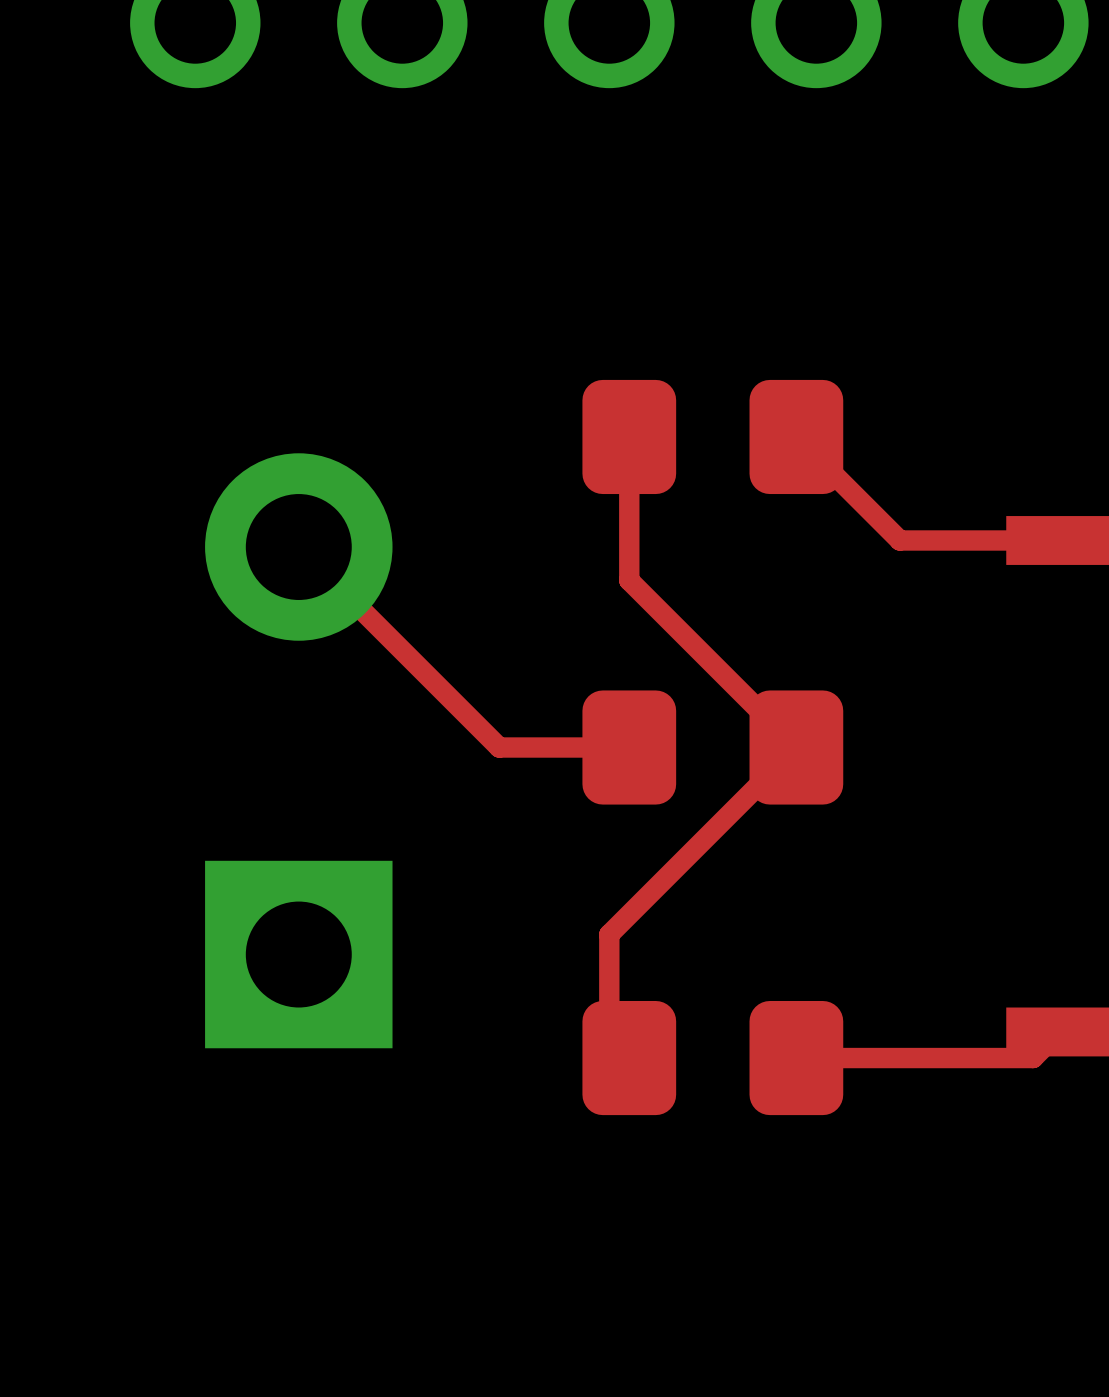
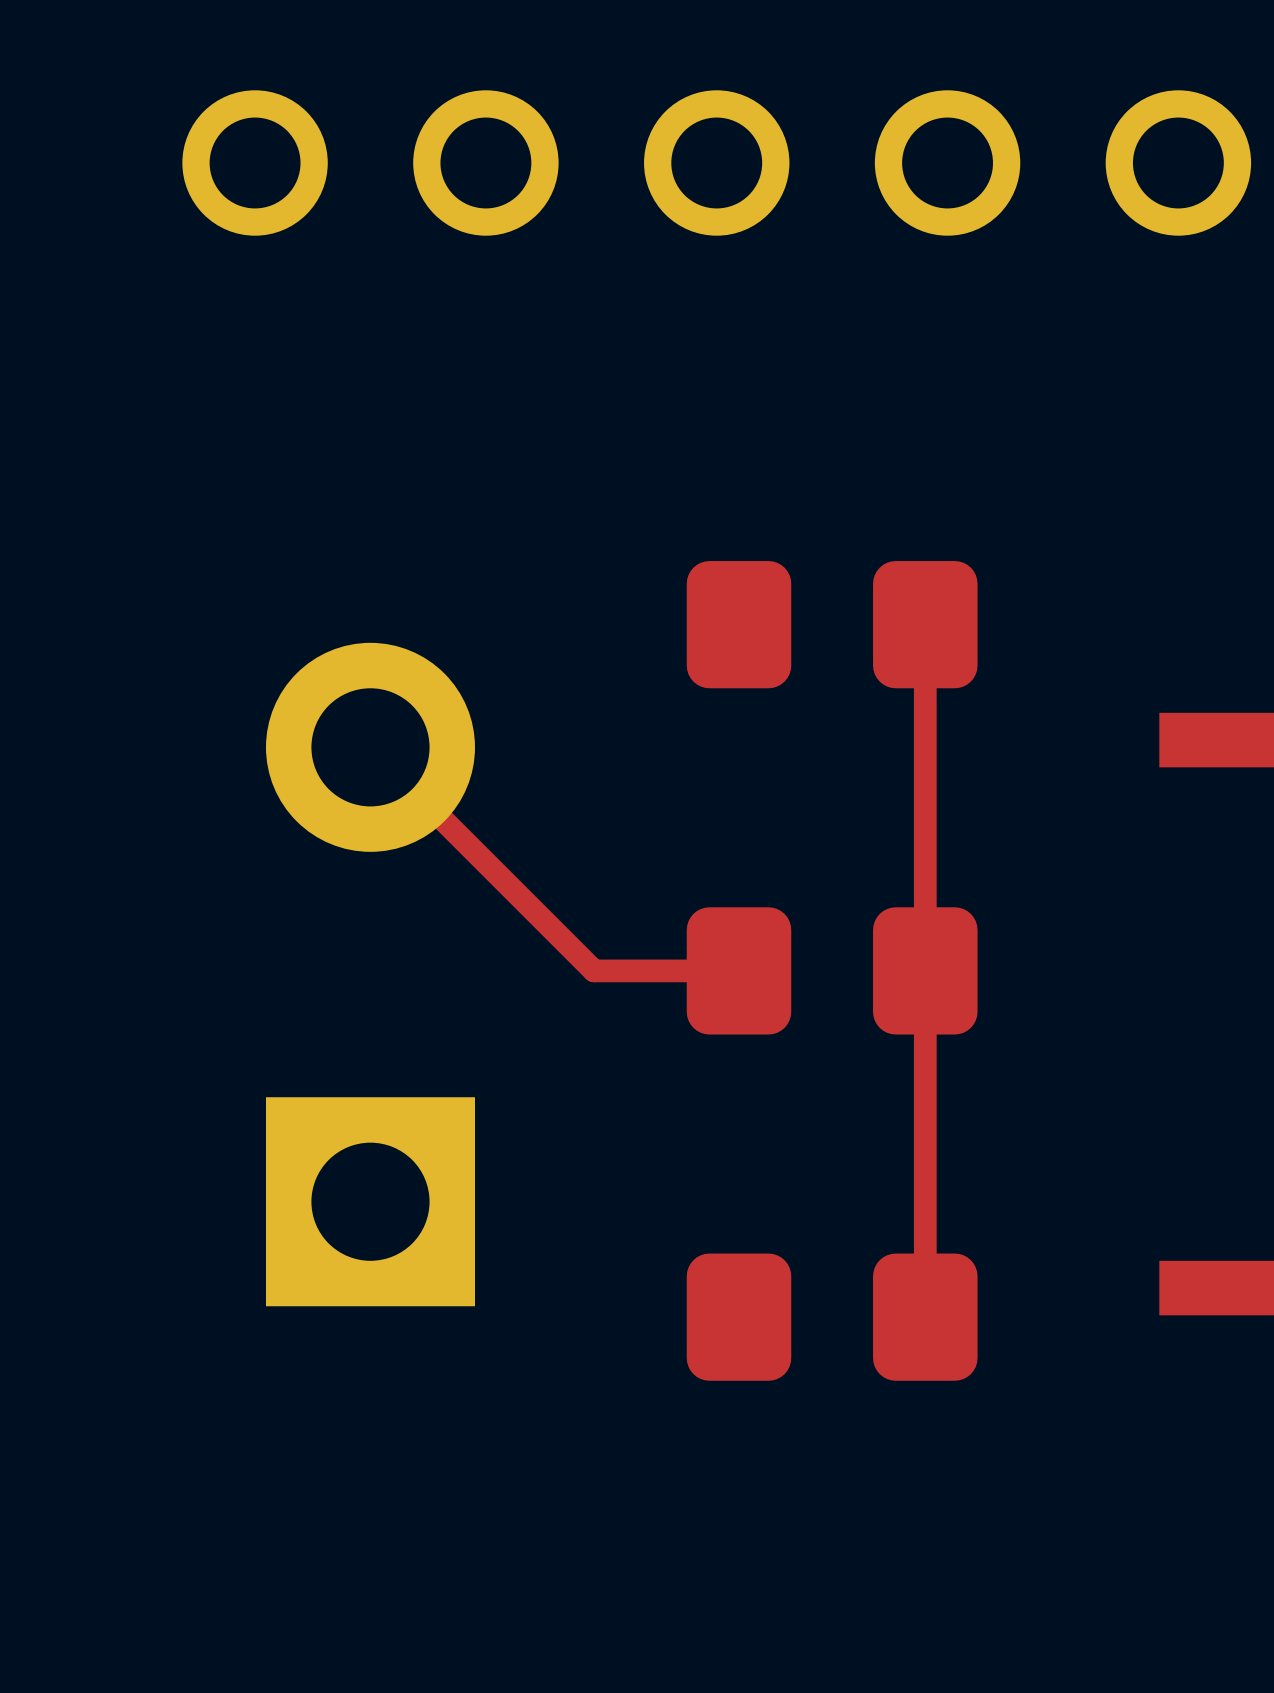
top track: (629, 436) (629, 580) (796, 747) (609, 934) (609, 1038) (629, 1058) -> none
top track: (796, 436) (899, 540) (1059, 540) -> (925, 624) (925, 1317)
top track: (1059, 1031) (1033, 1058) (796, 1058) -> none

